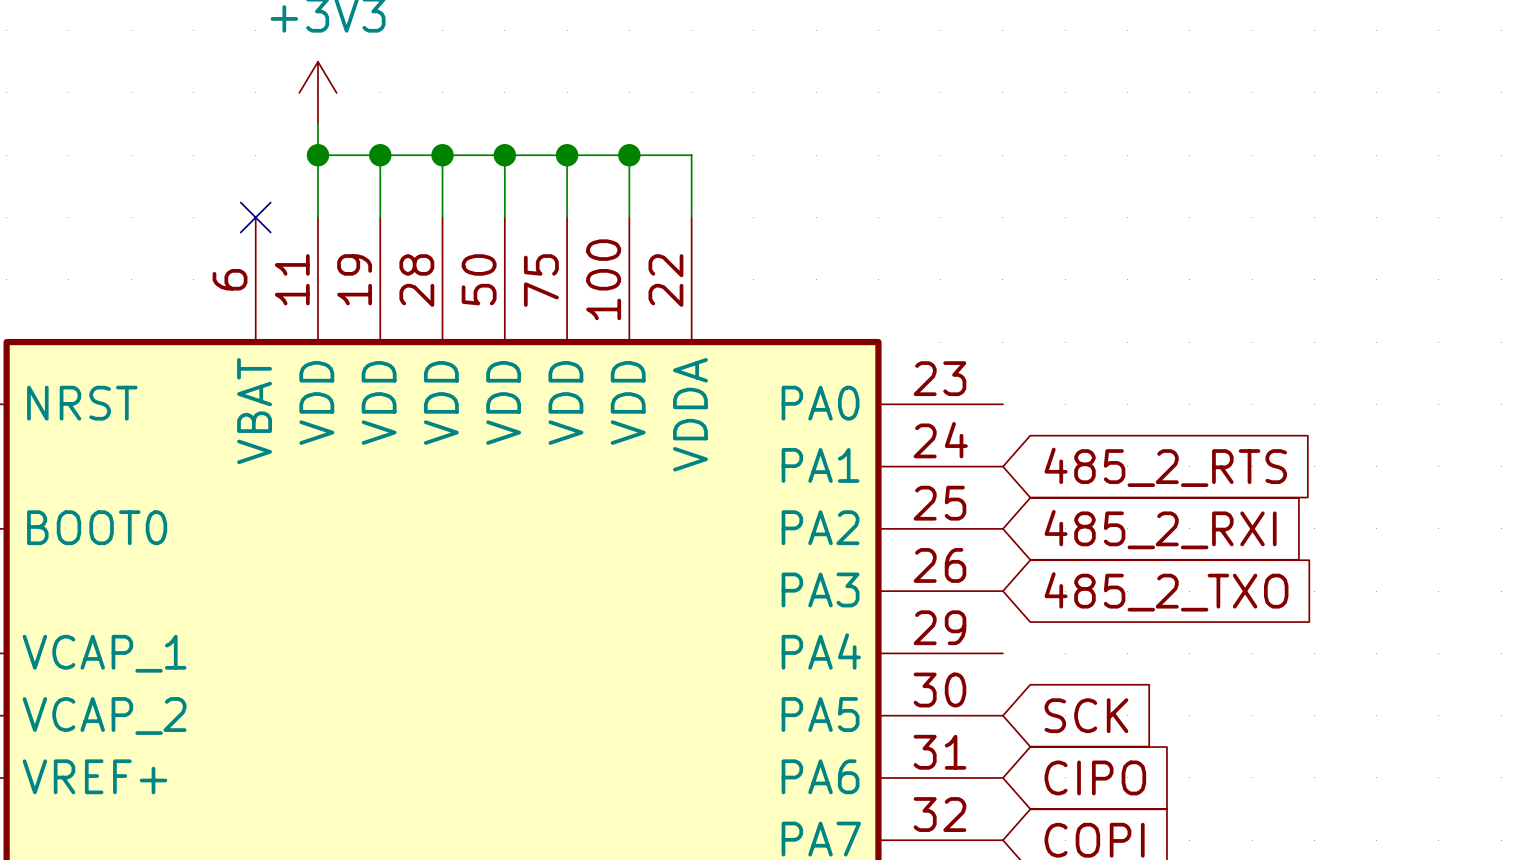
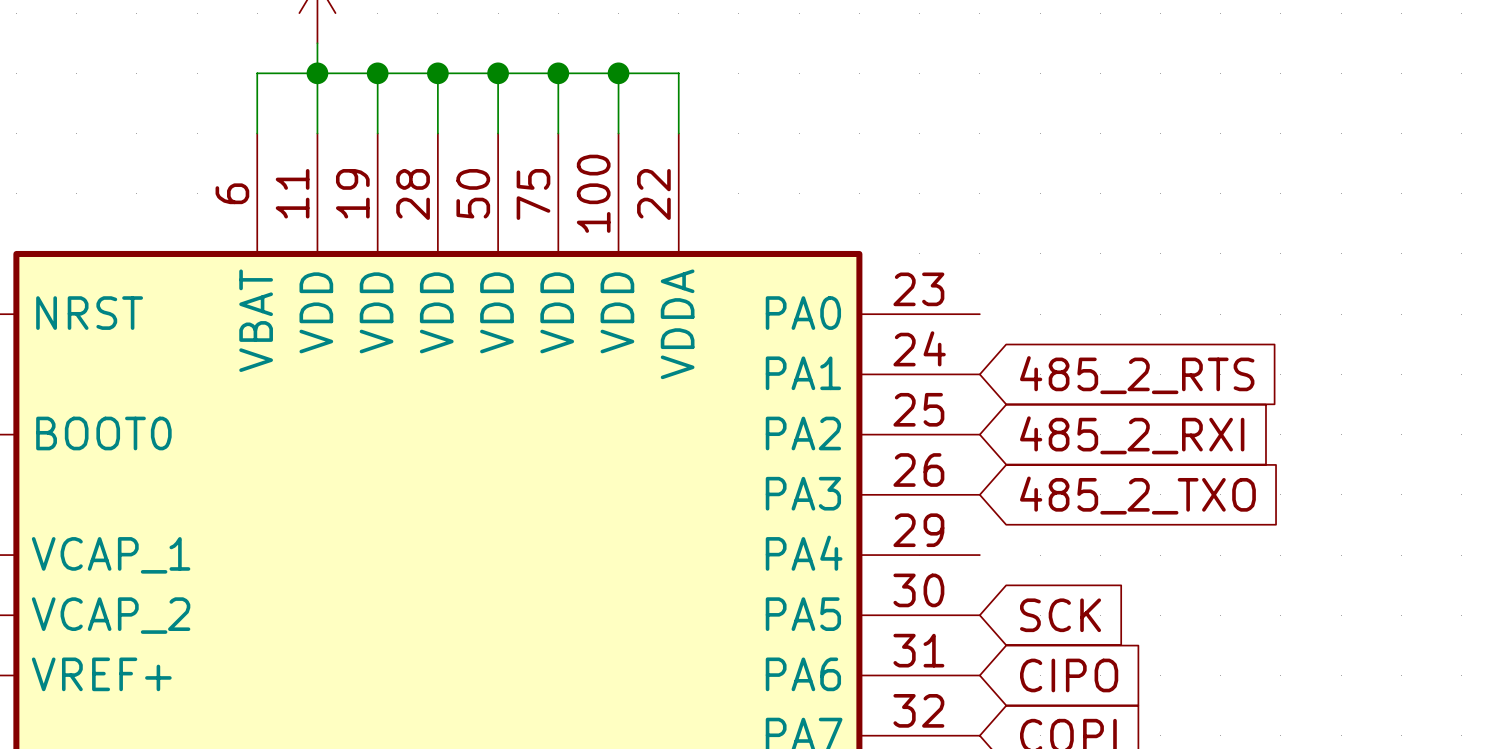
wire: none -> (317, 73) (257, 73) (257, 133)
no-connect mark: (255, 217) -> none

